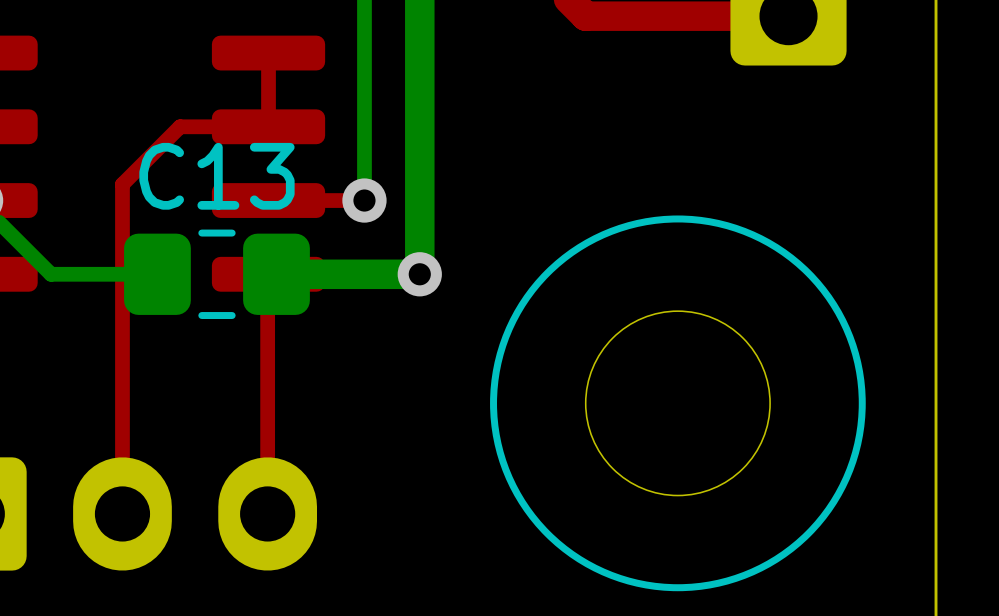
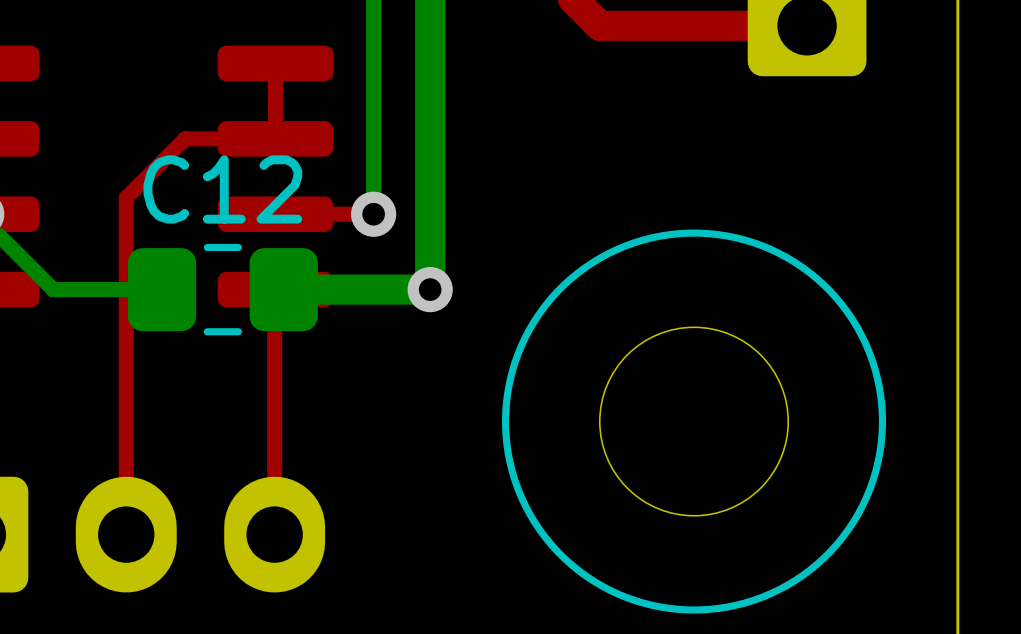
C13 name: C13 (216, 176) -> C12 (222, 189)

